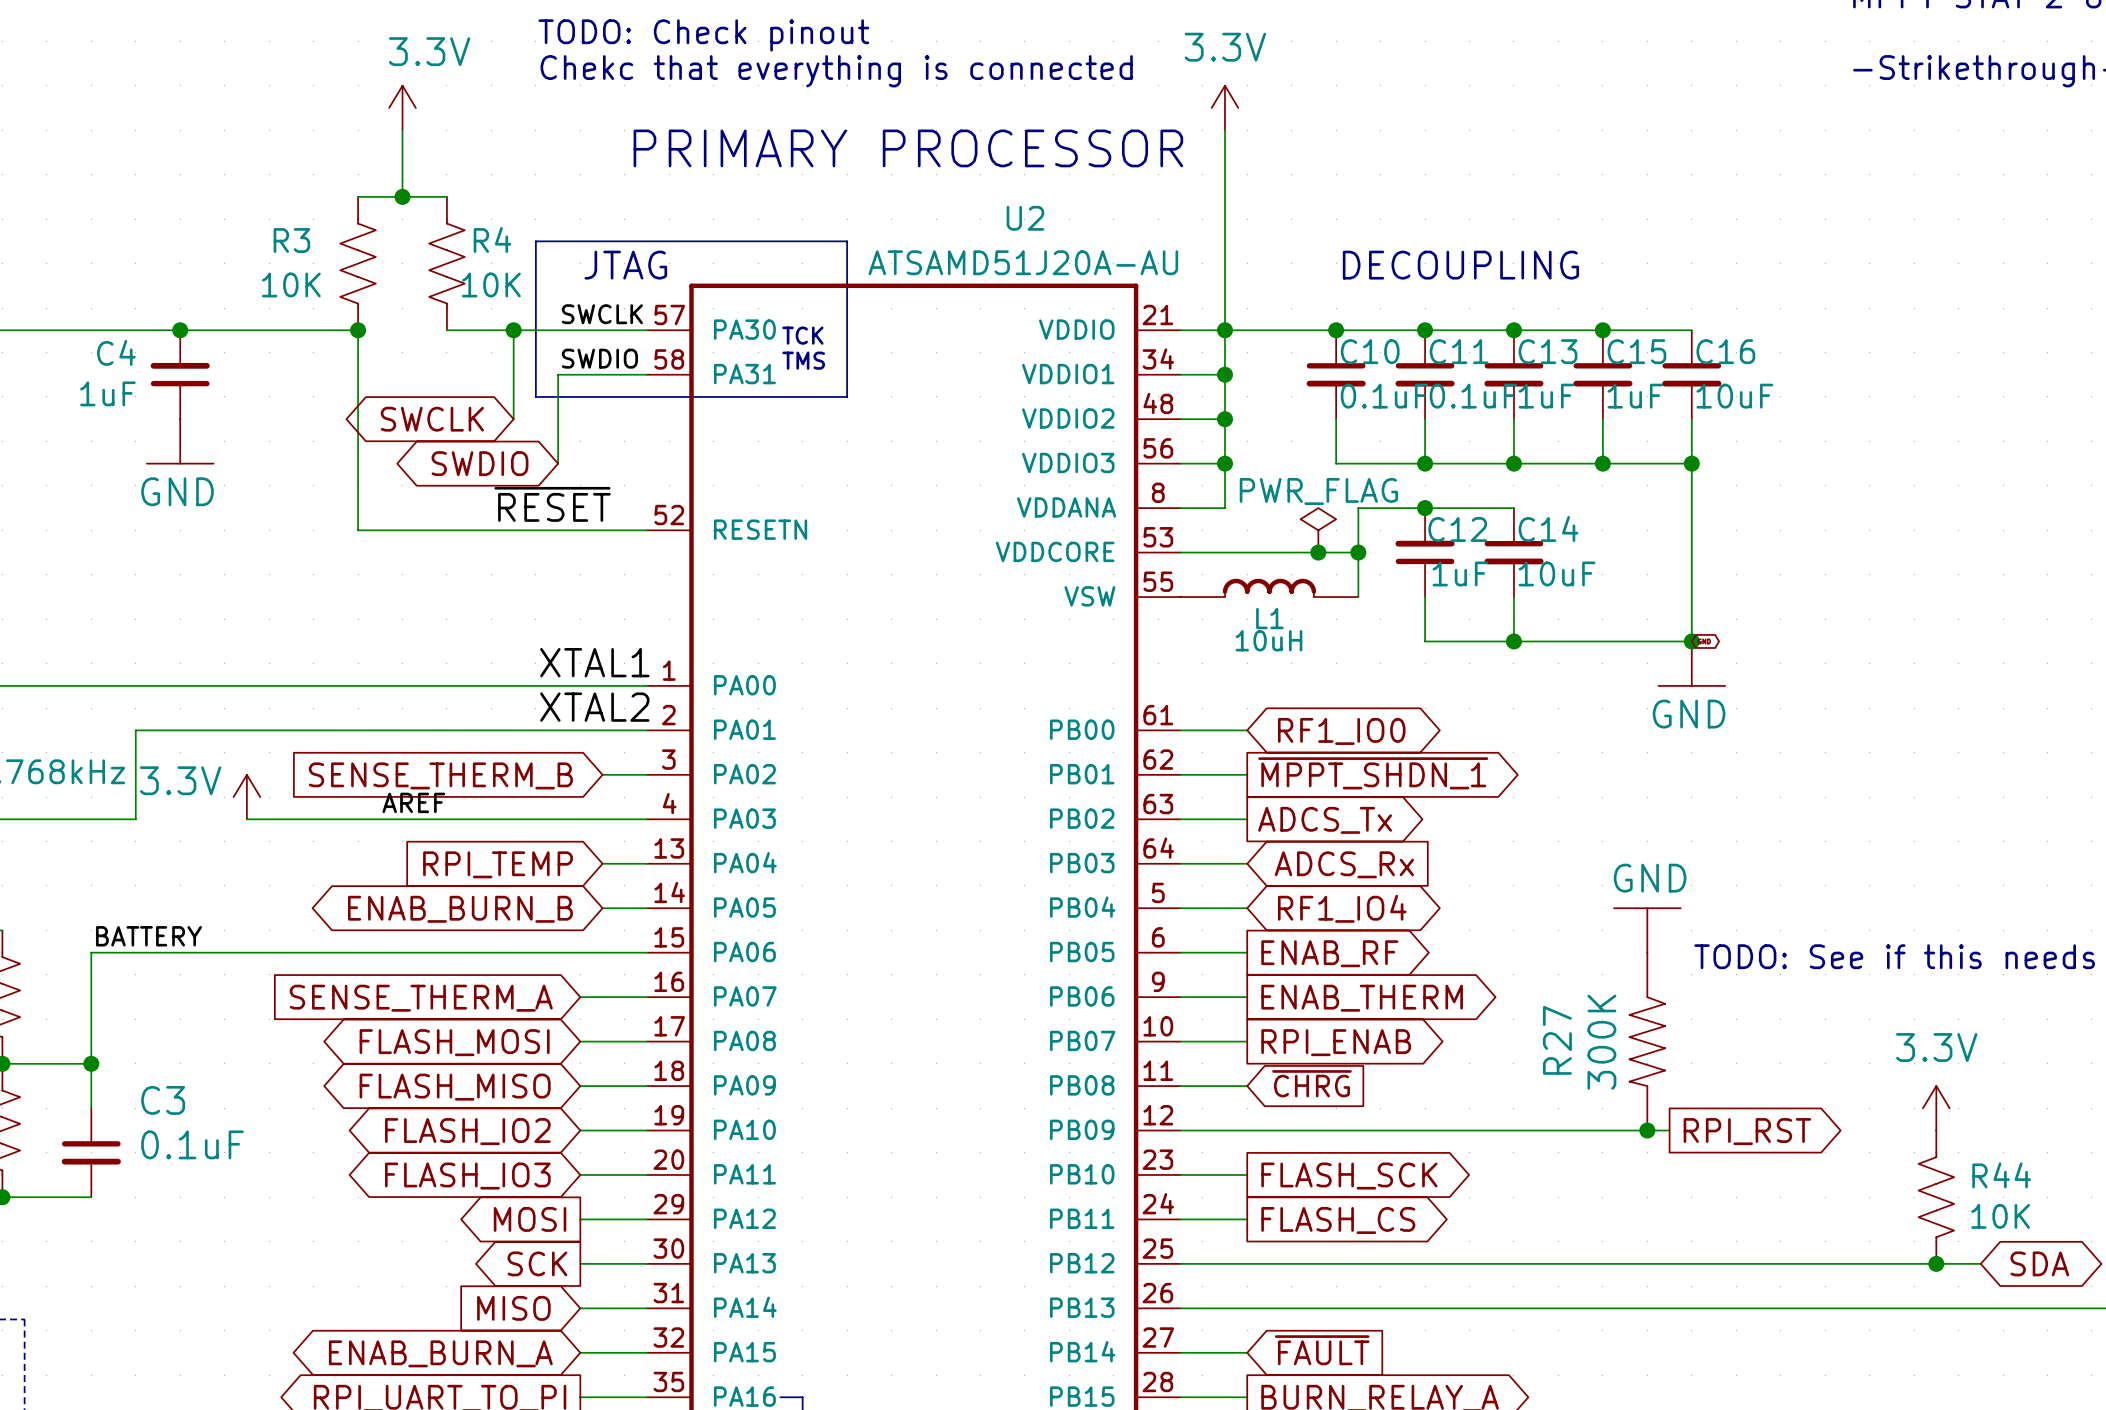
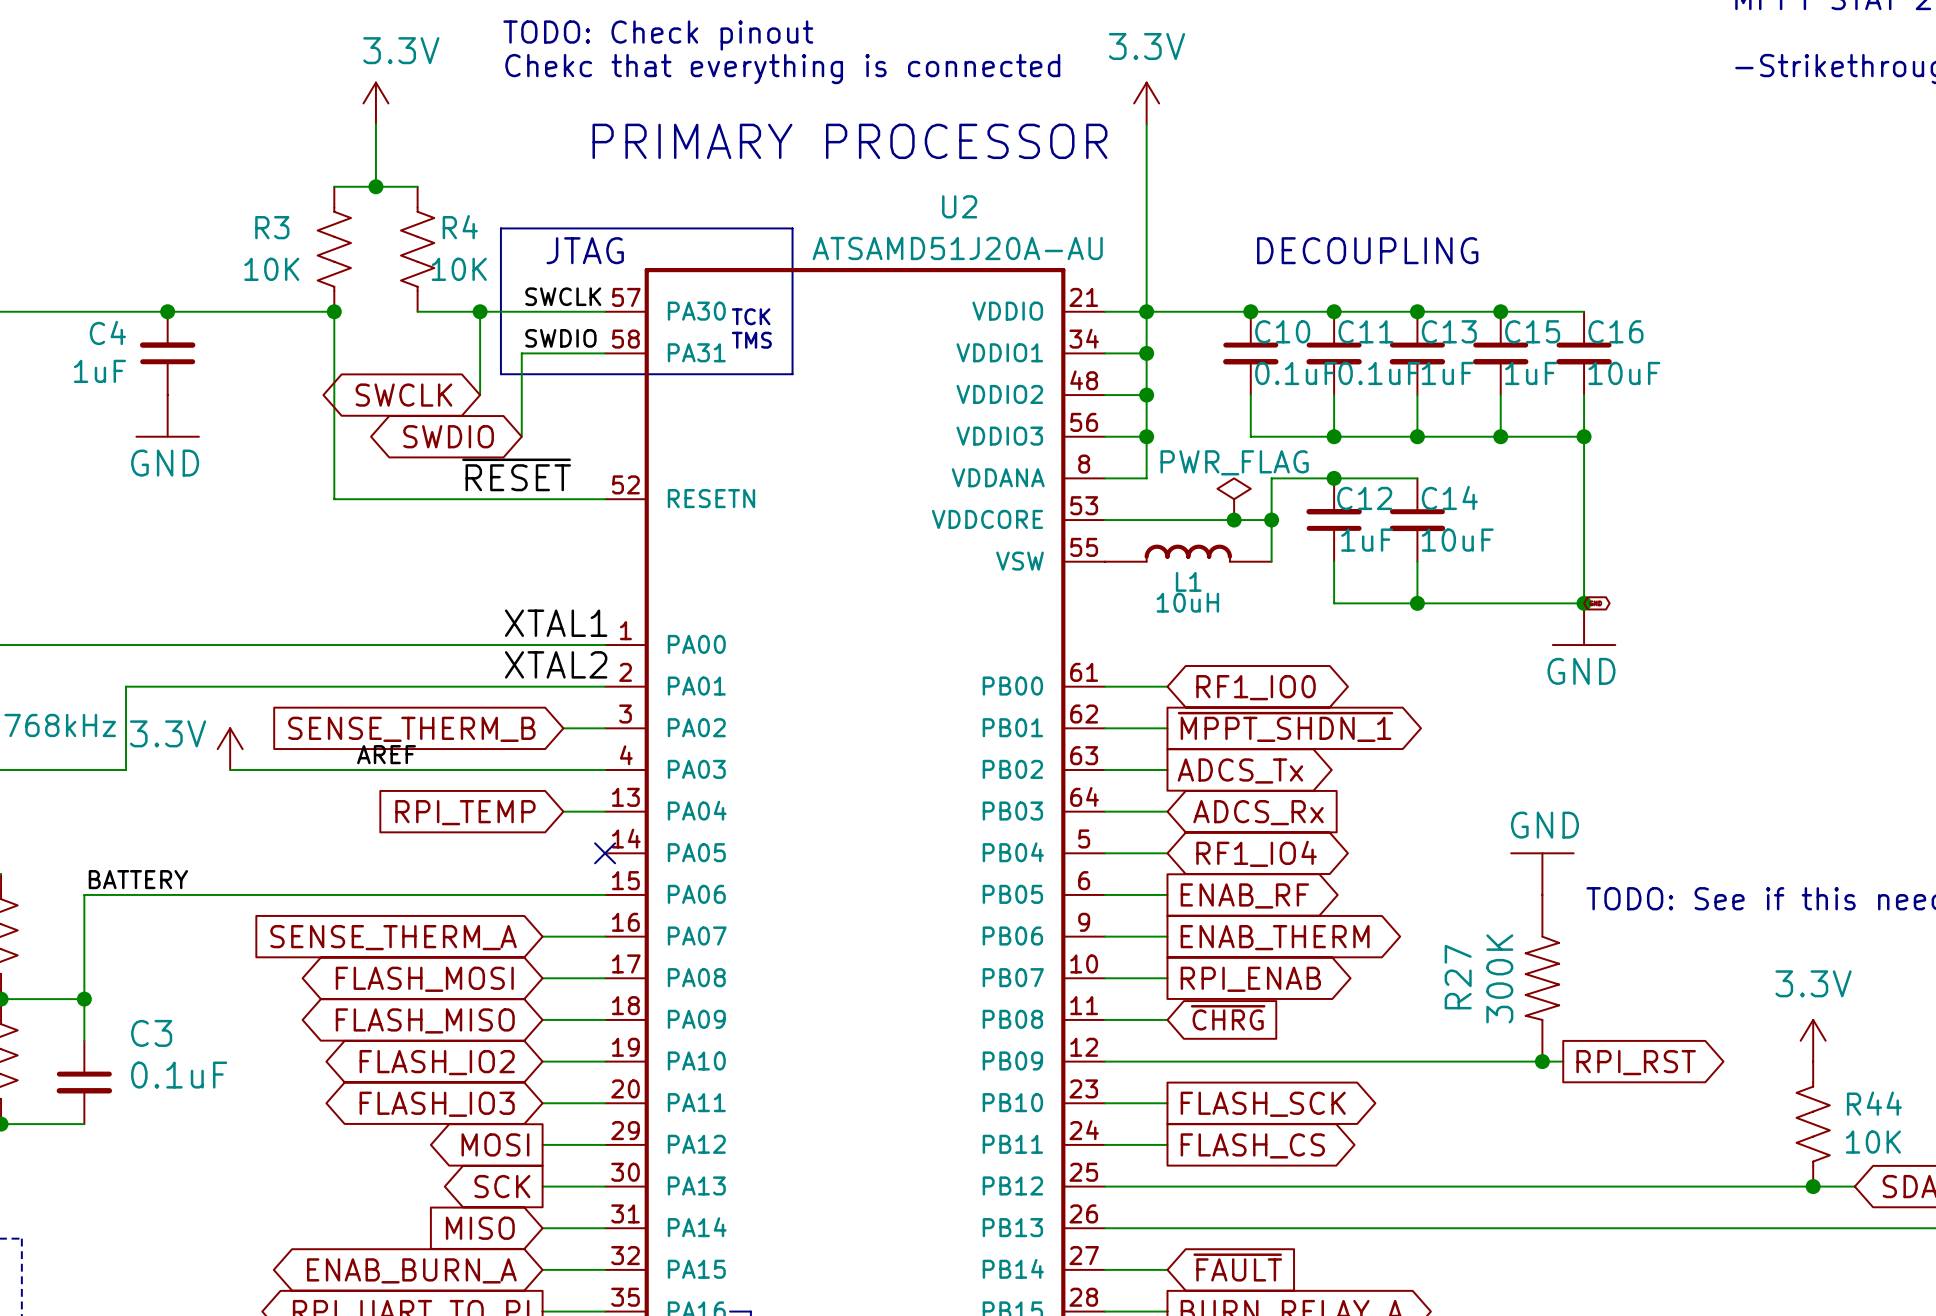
wire: (602, 908) (647, 908) -> none
no-connect mark: none -> (605, 853)
global label: ENAB_BURN_B (460, 909) -> none

